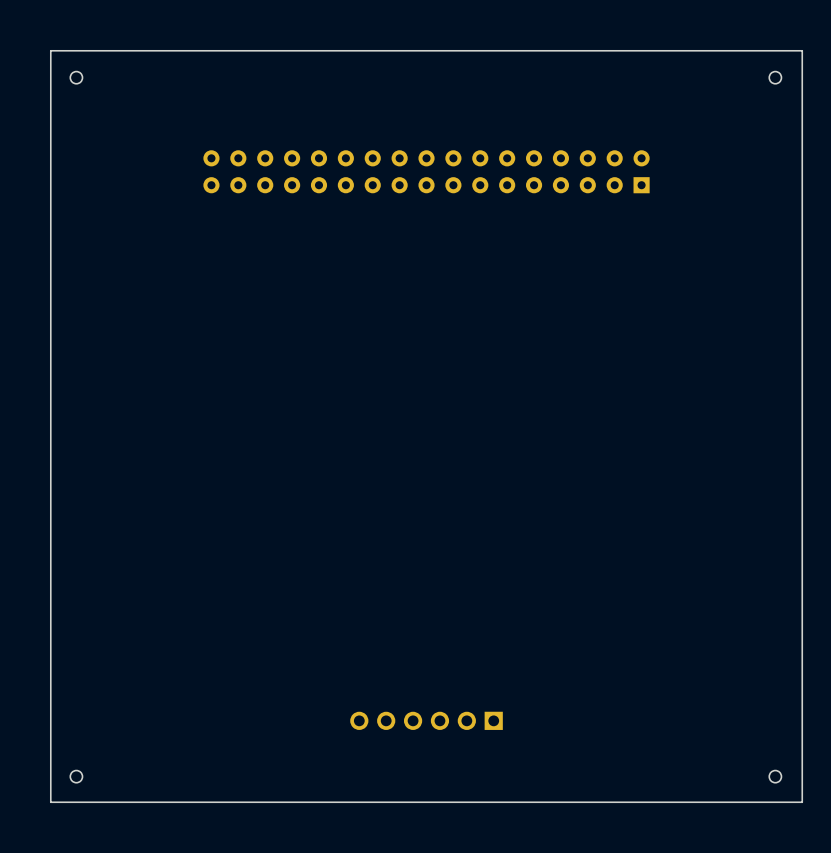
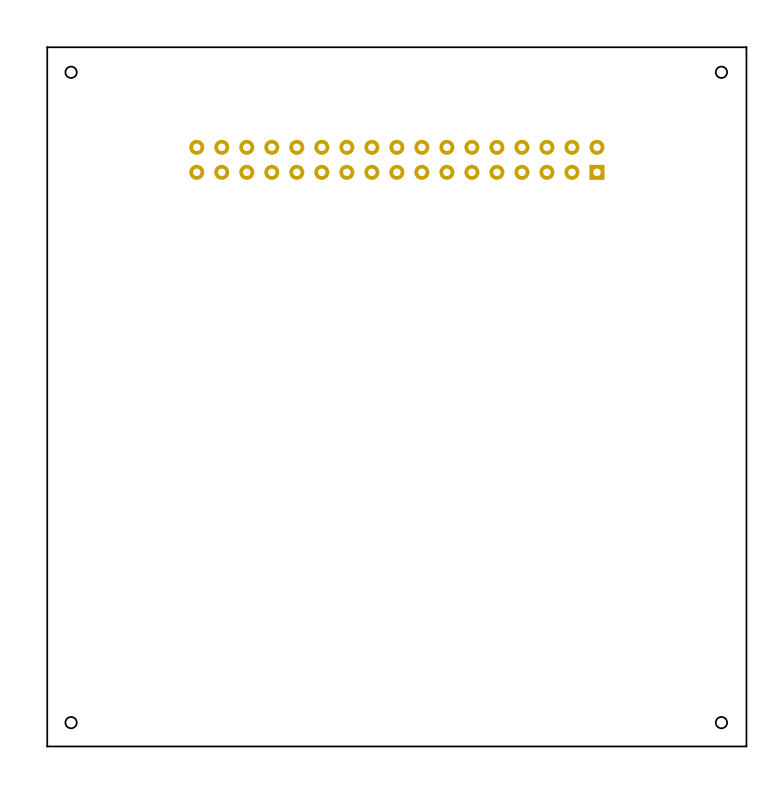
part: (426, 720) -> none

